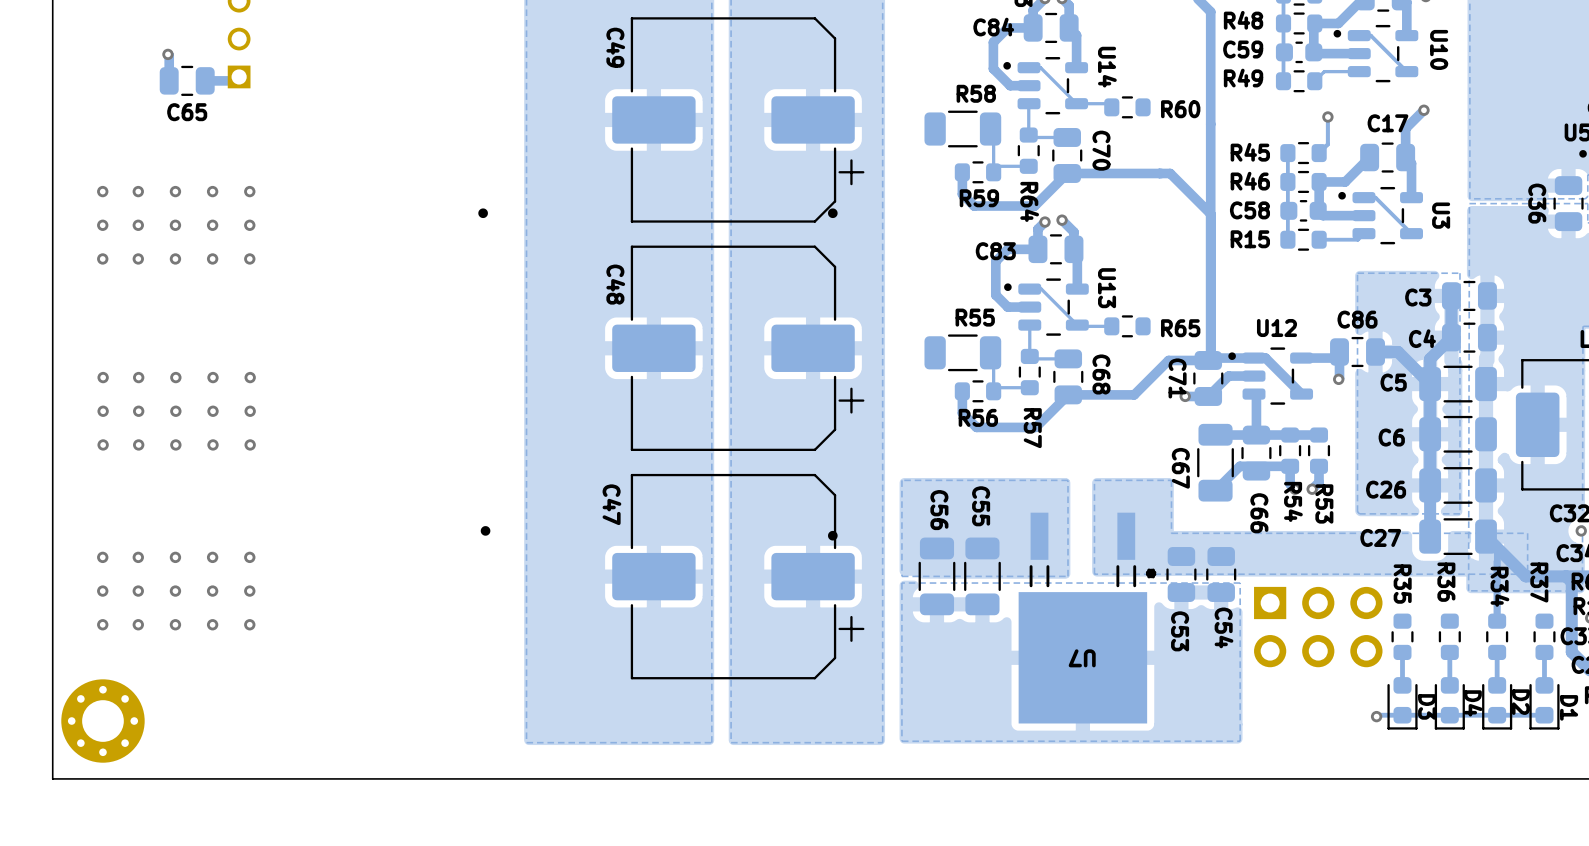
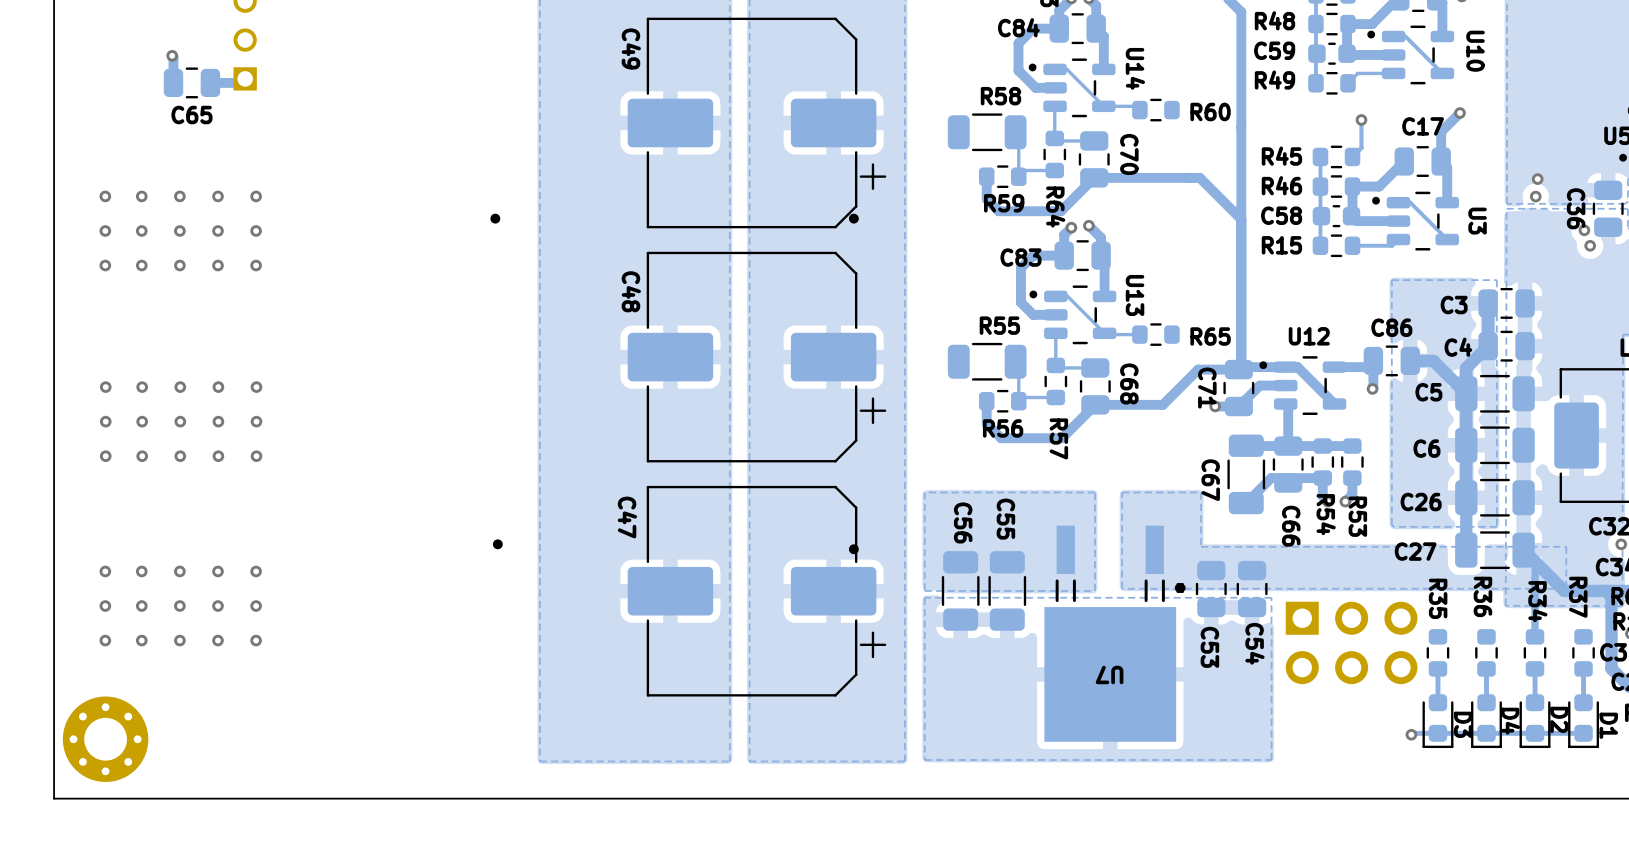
via: none -> (1537, 179)
via: none -> (1535, 196)
via: none -> (1584, 230)
via: none -> (1590, 245)

